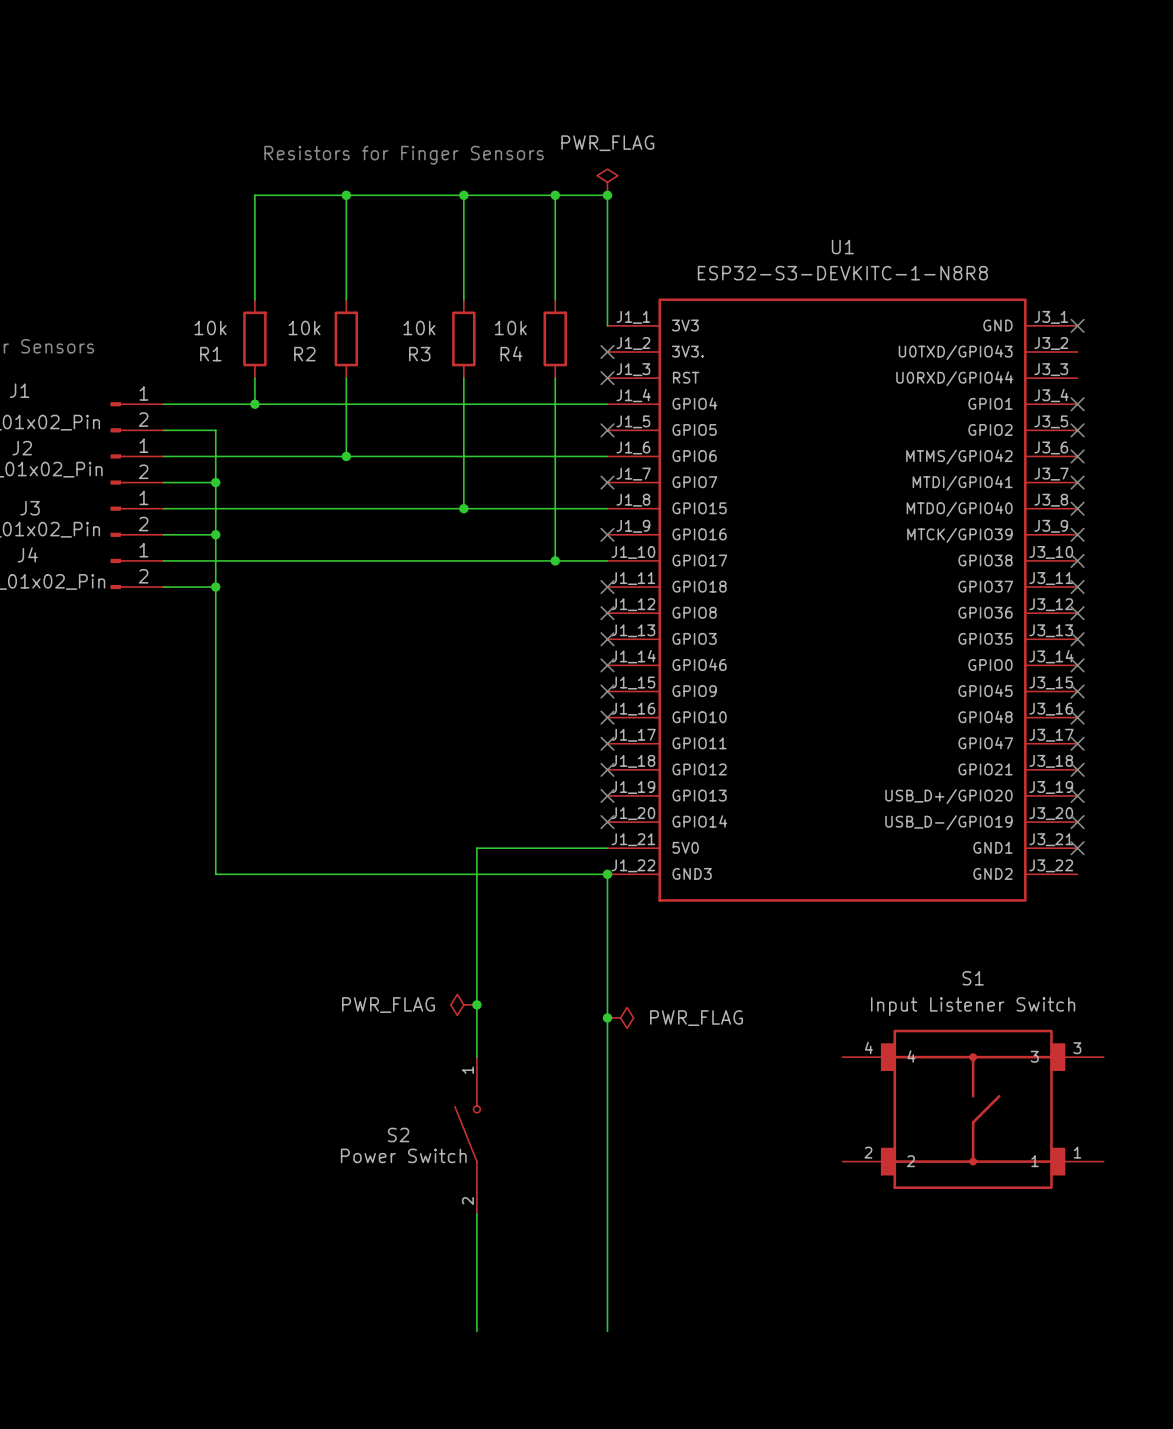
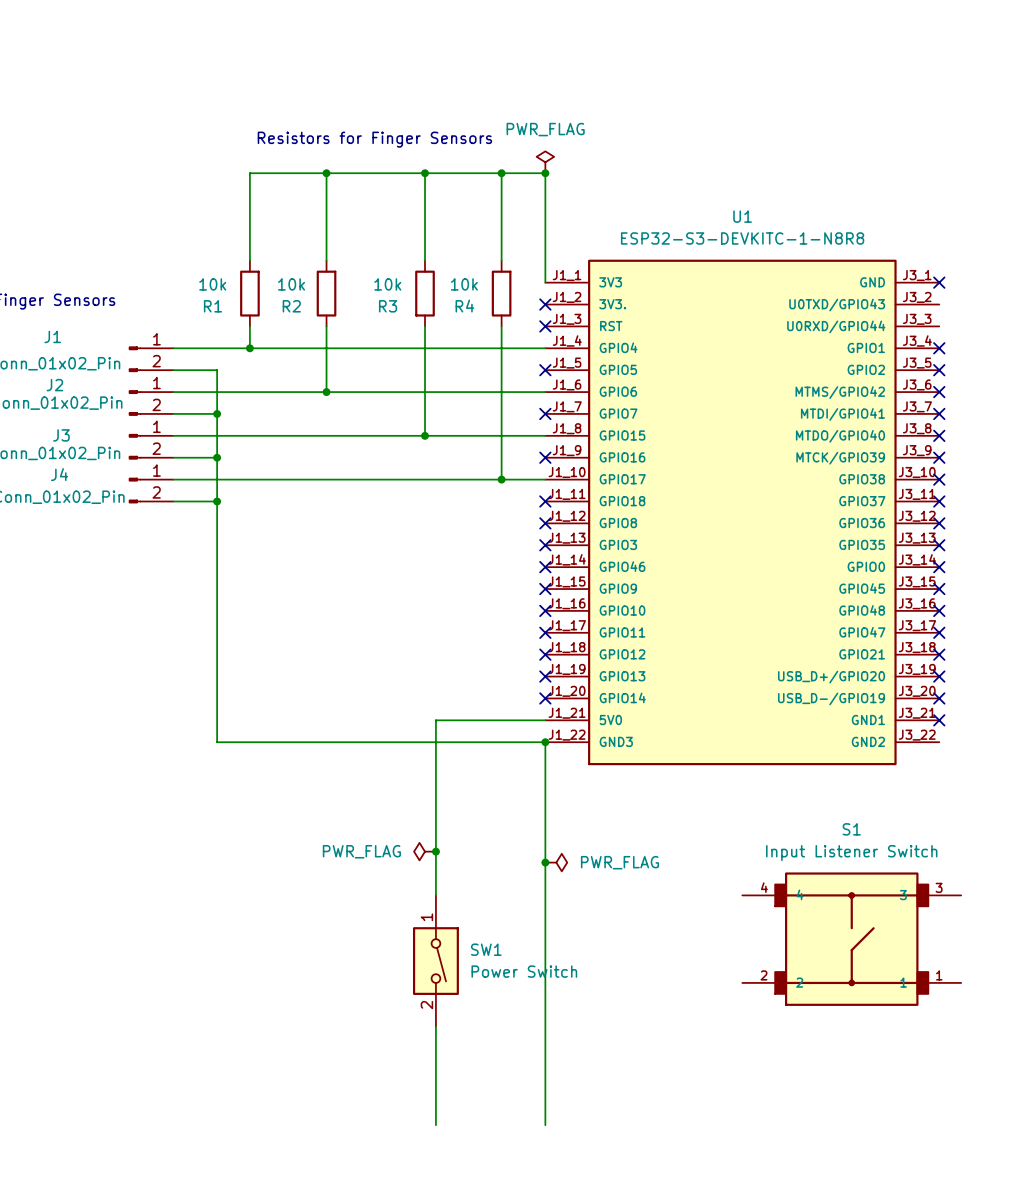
S2: Power Switch (467, 1135) -> none
SW1: none -> Power Switch (435, 961)

